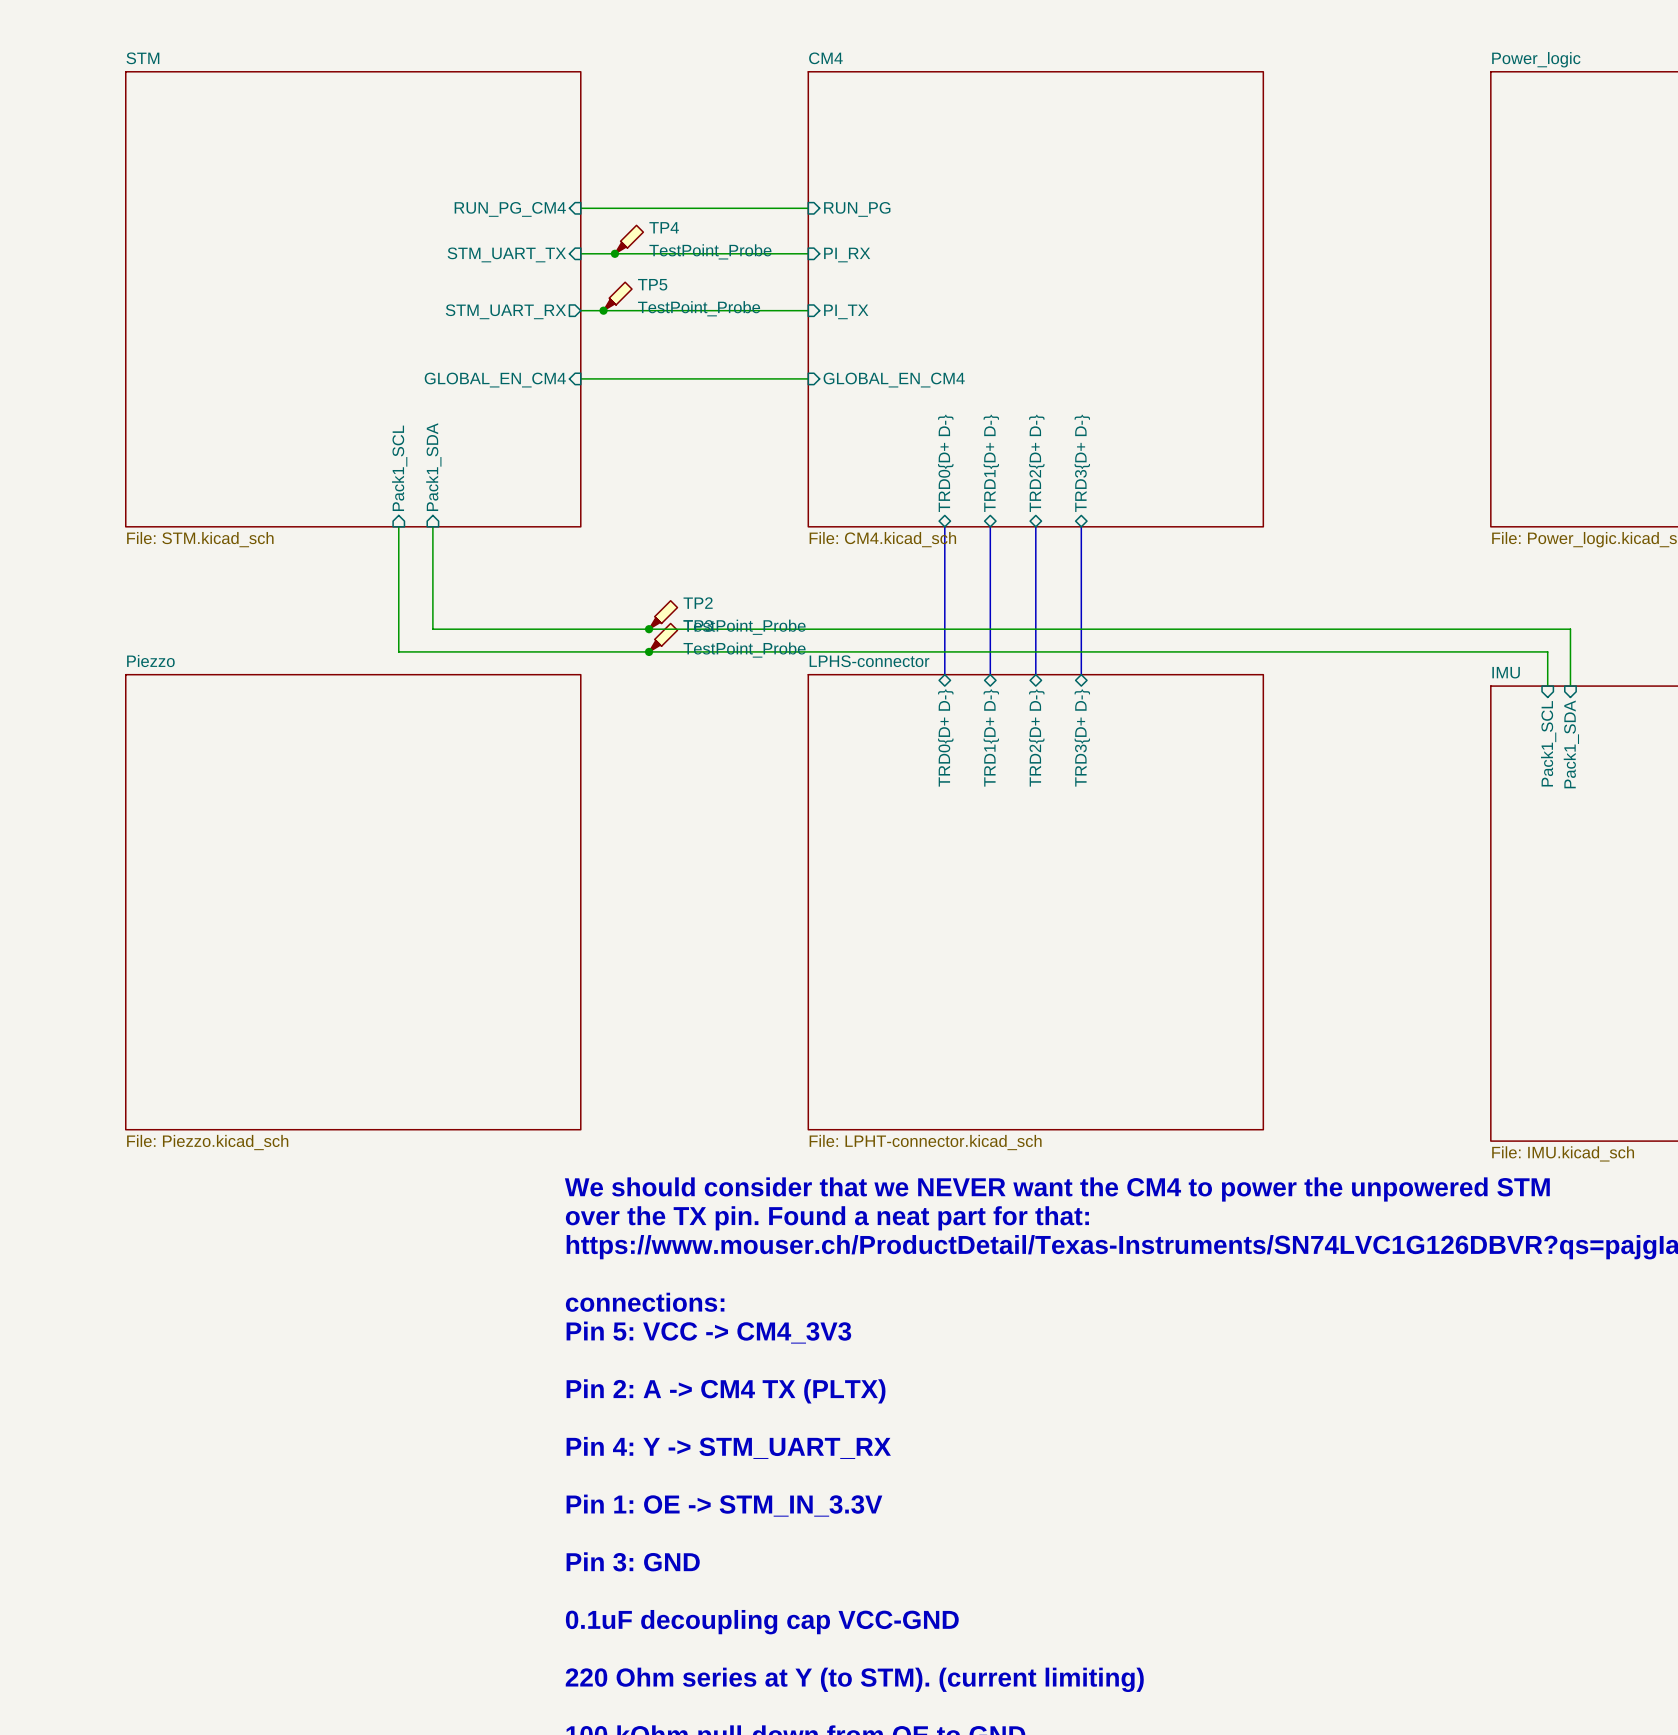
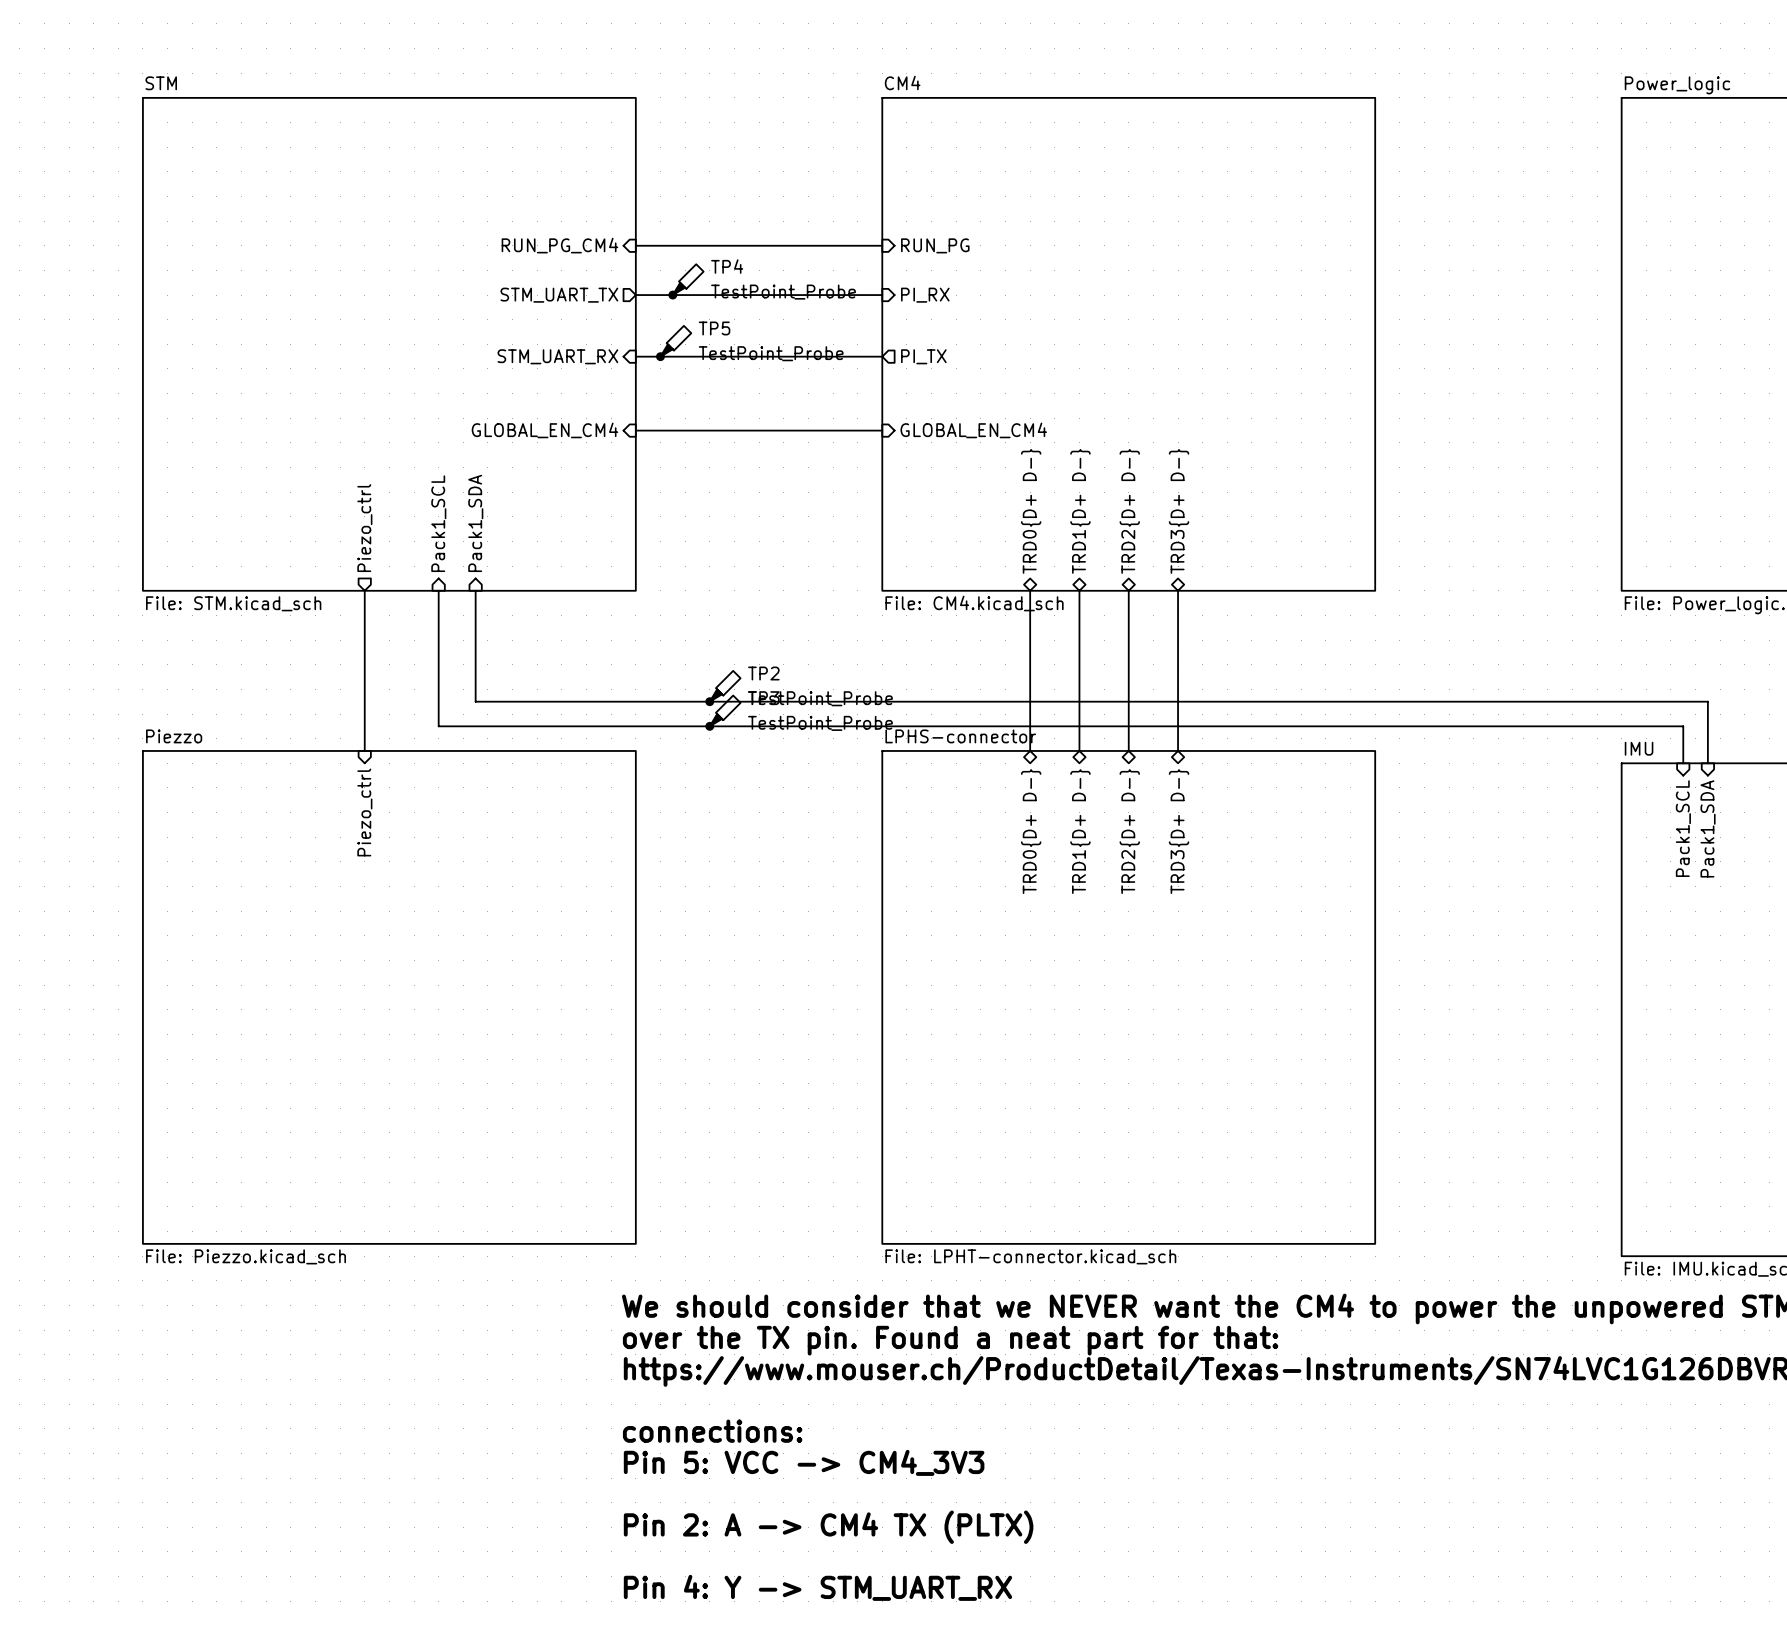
sheet pin shape: input (506, 254) -> output (559, 295)
sheet pin shape: output (505, 311) -> input (557, 356)
sheet pin shape: input (846, 311) -> output (923, 356)
sheet pin: none -> Piezo_ctrl (364, 528)
wire: none -> (364, 590) (364, 750)
sheet pin: none -> Piezo_ctrl (364, 812)

